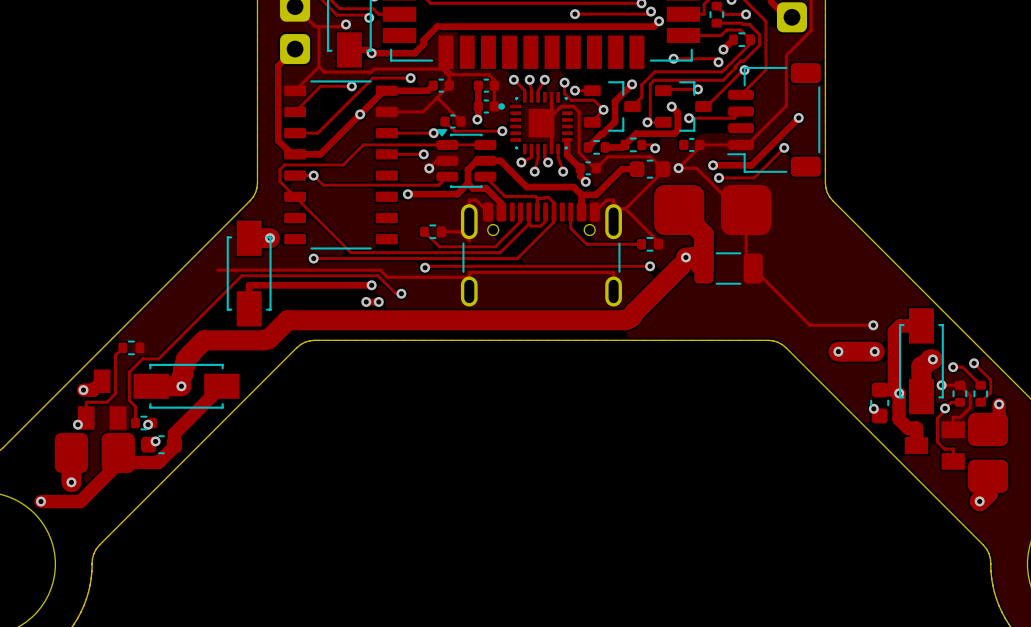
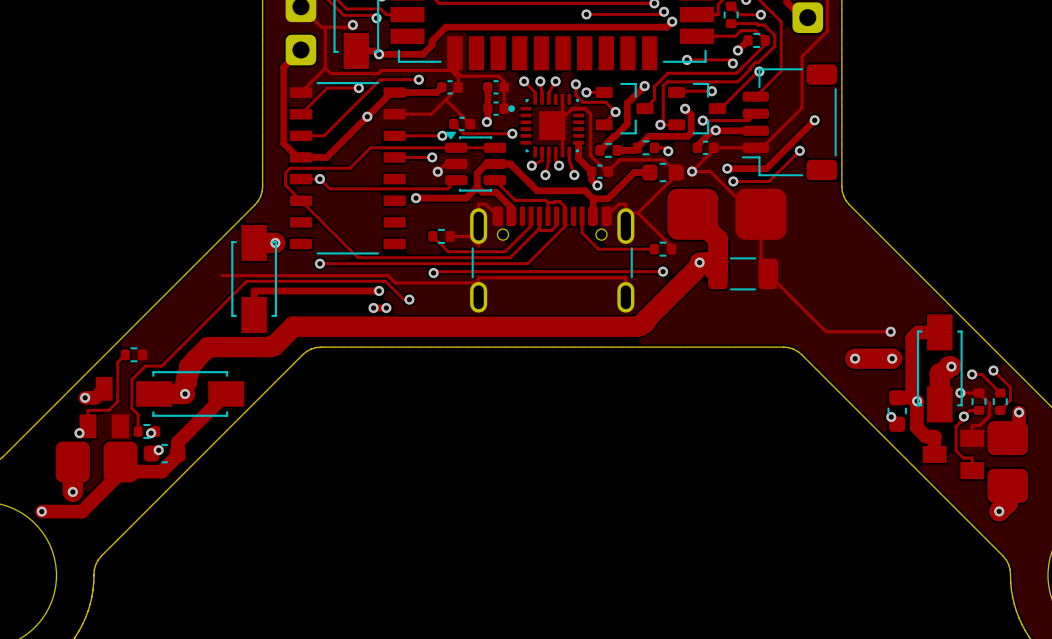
via: none -> (715, 130)
track: none -> (755, 130) (712, 130) (697, 147)

